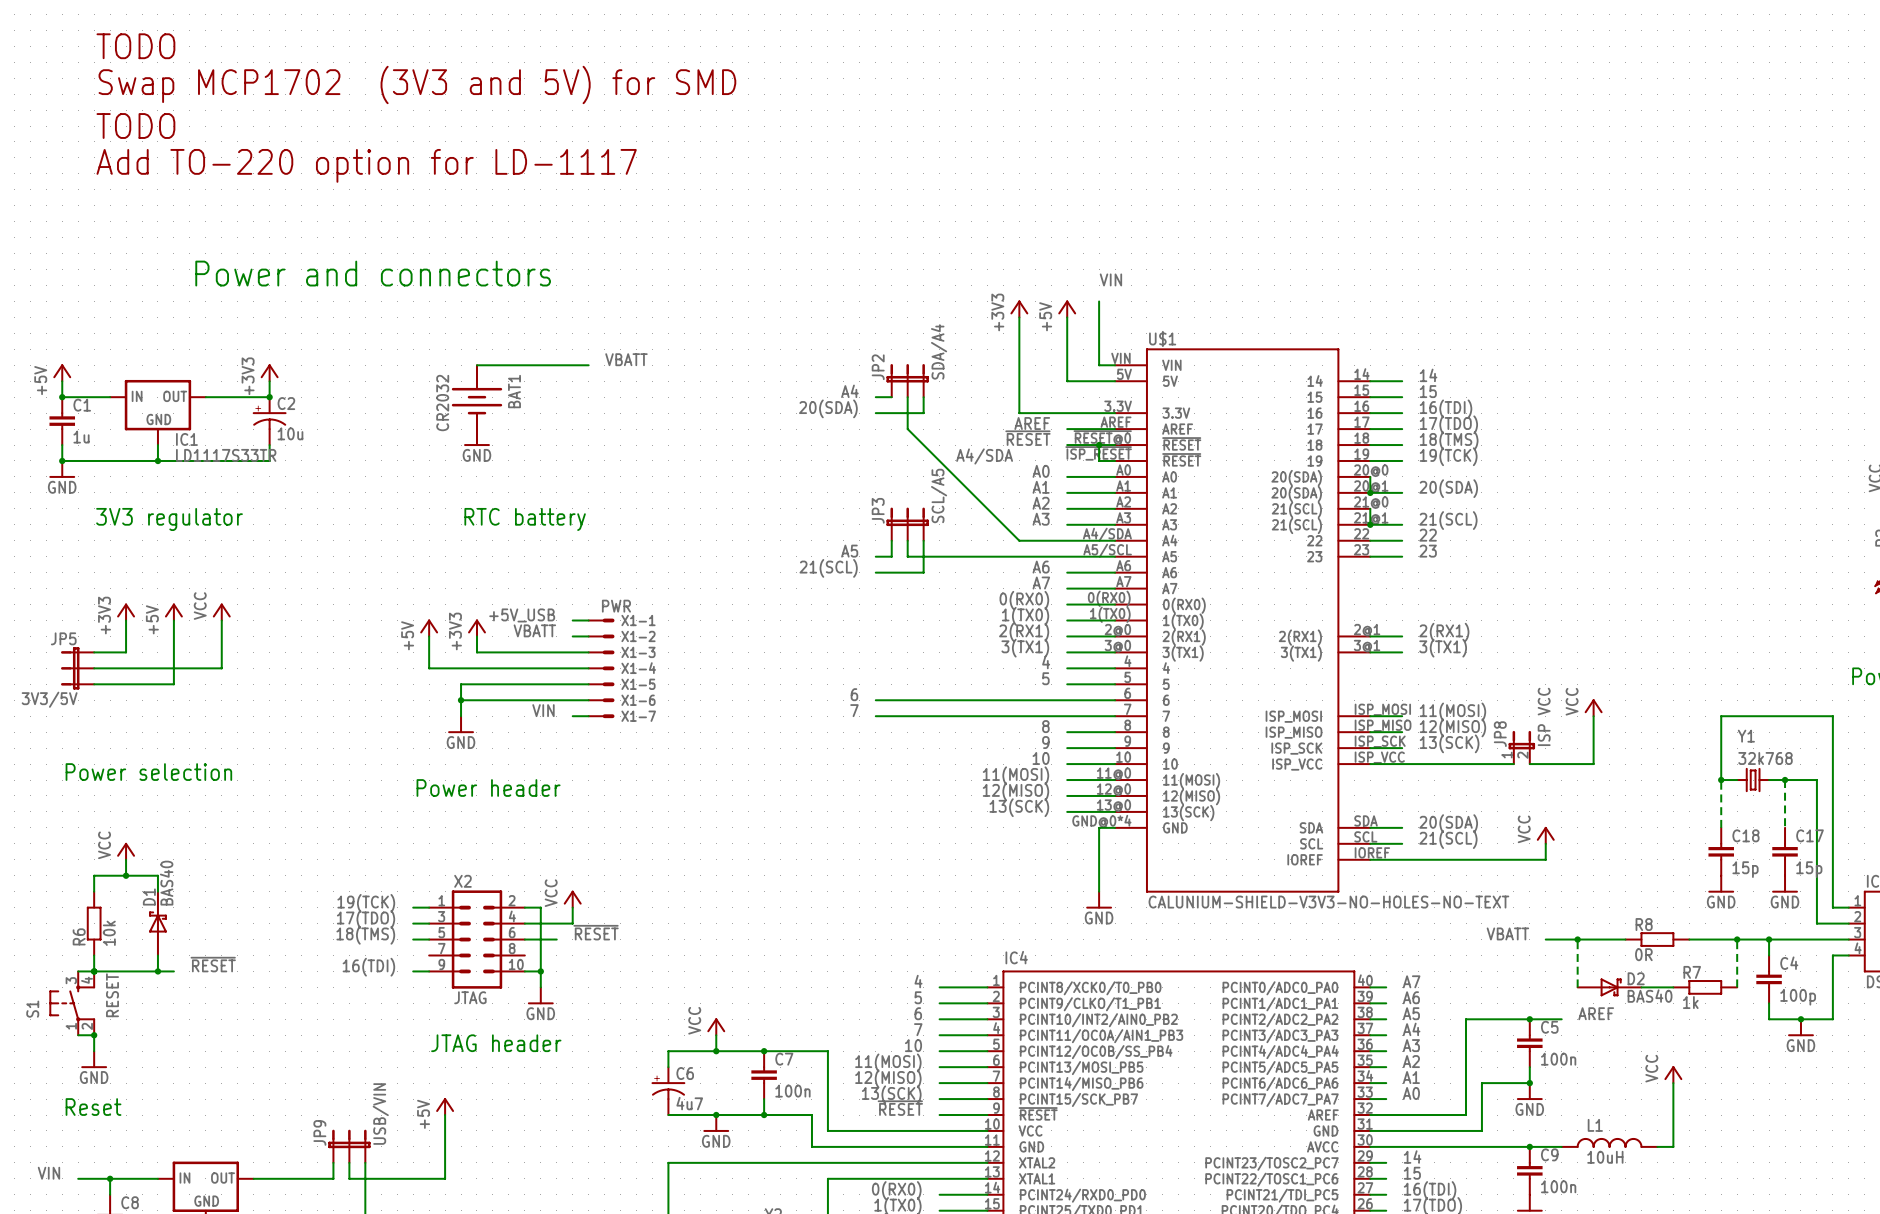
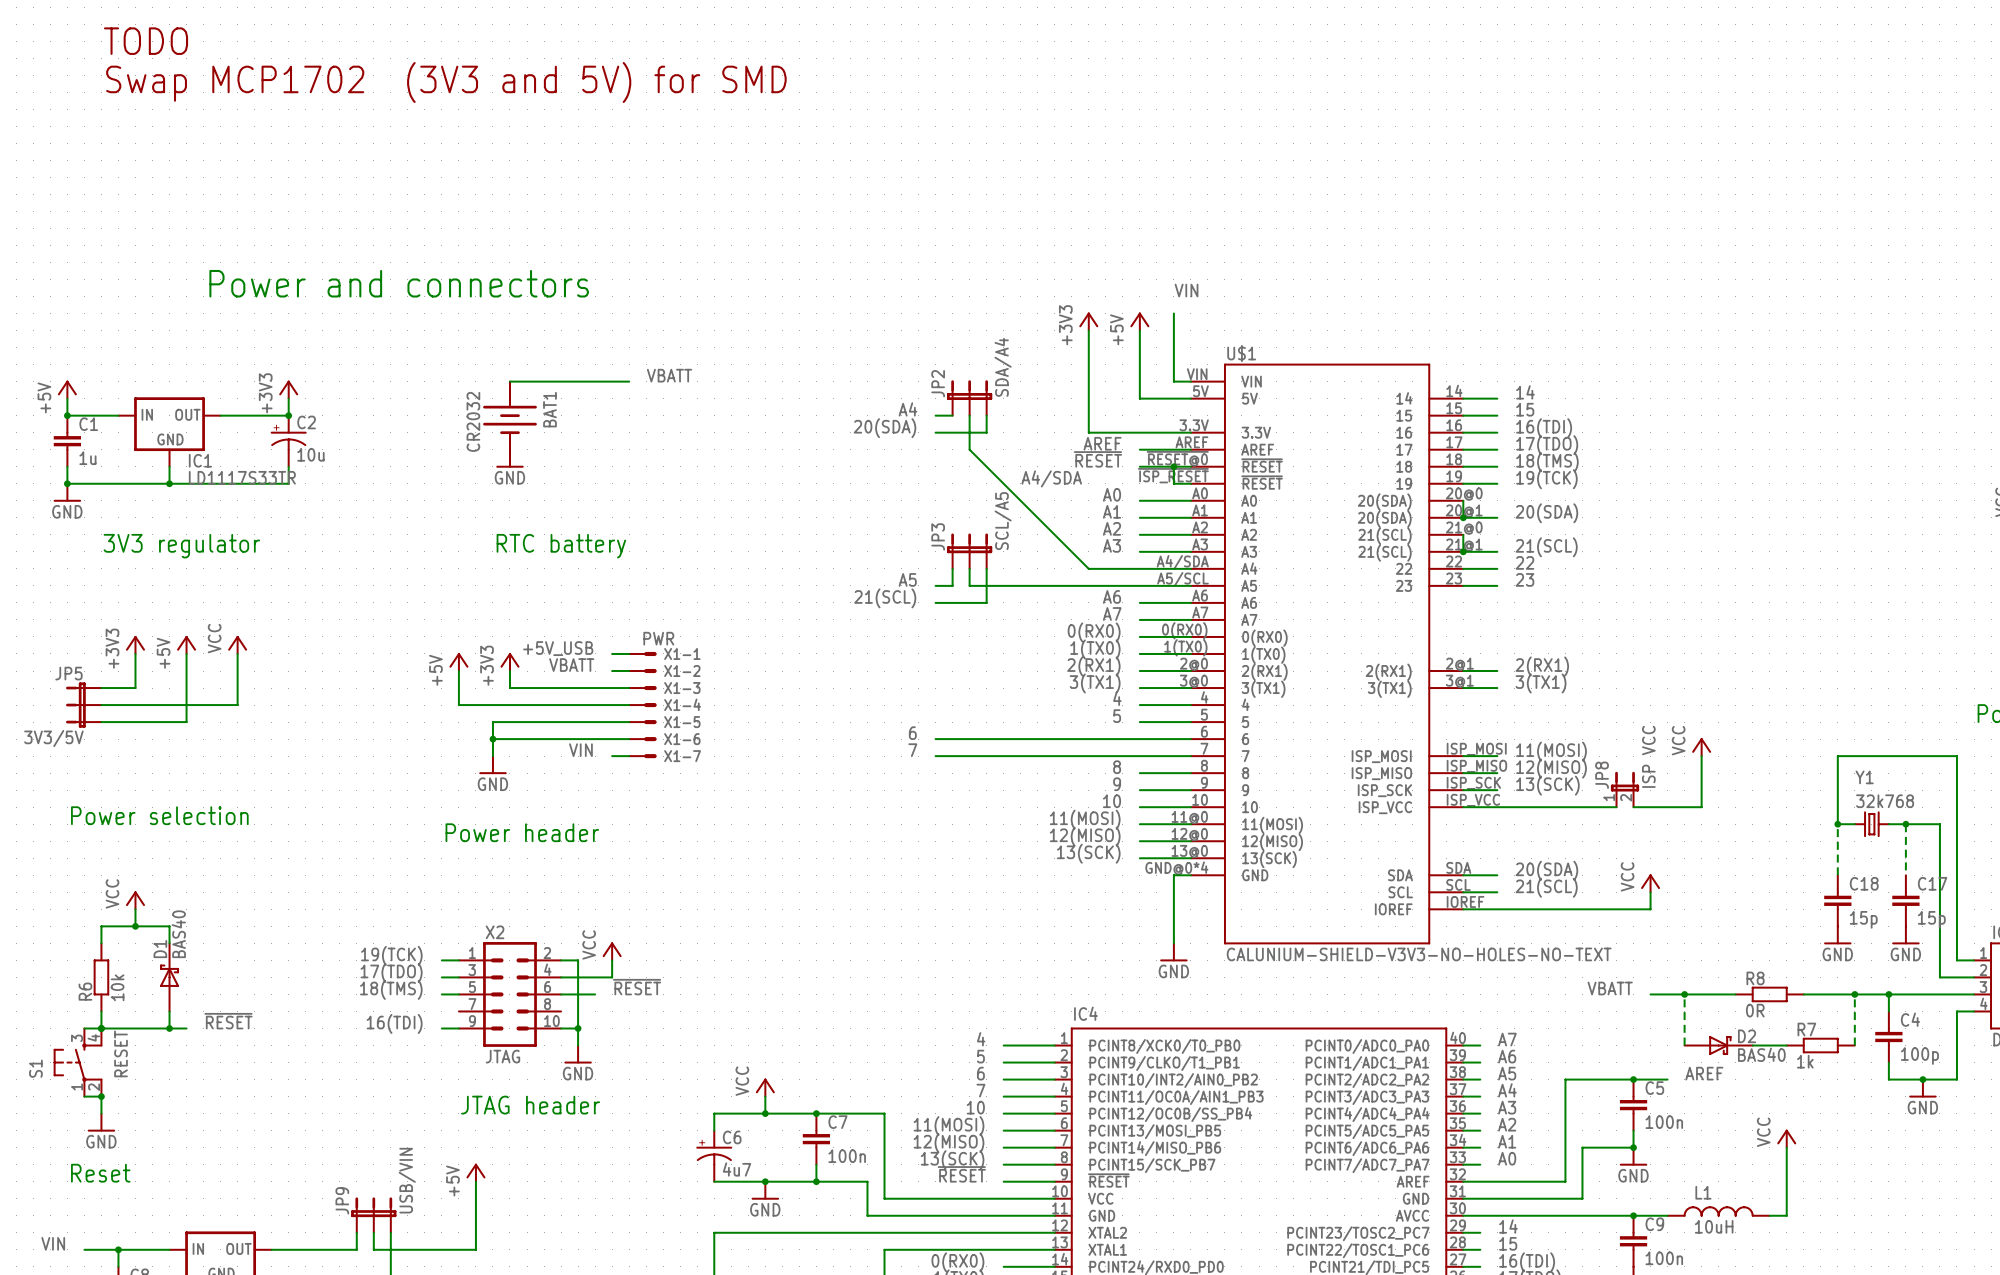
text: TODO (135, 126) -> none
text: Add TO-220 option for LD-1117 (366, 165) -> none

